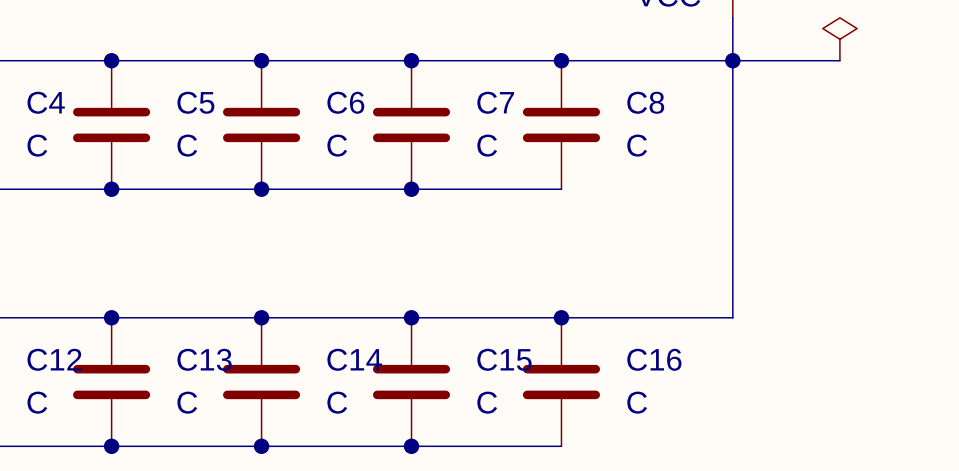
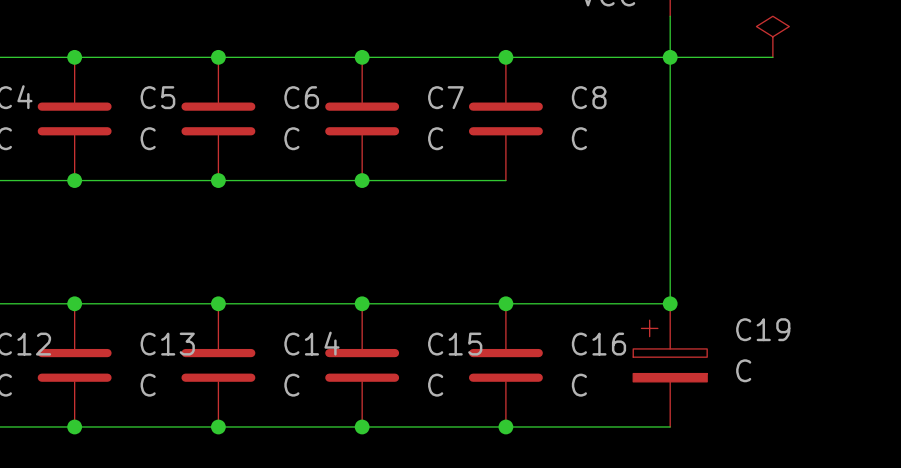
junction: none -> (670, 303)
C19: none -> C (670, 365)
wire: none -> (505, 426) (670, 426)
junction: none -> (505, 426)

